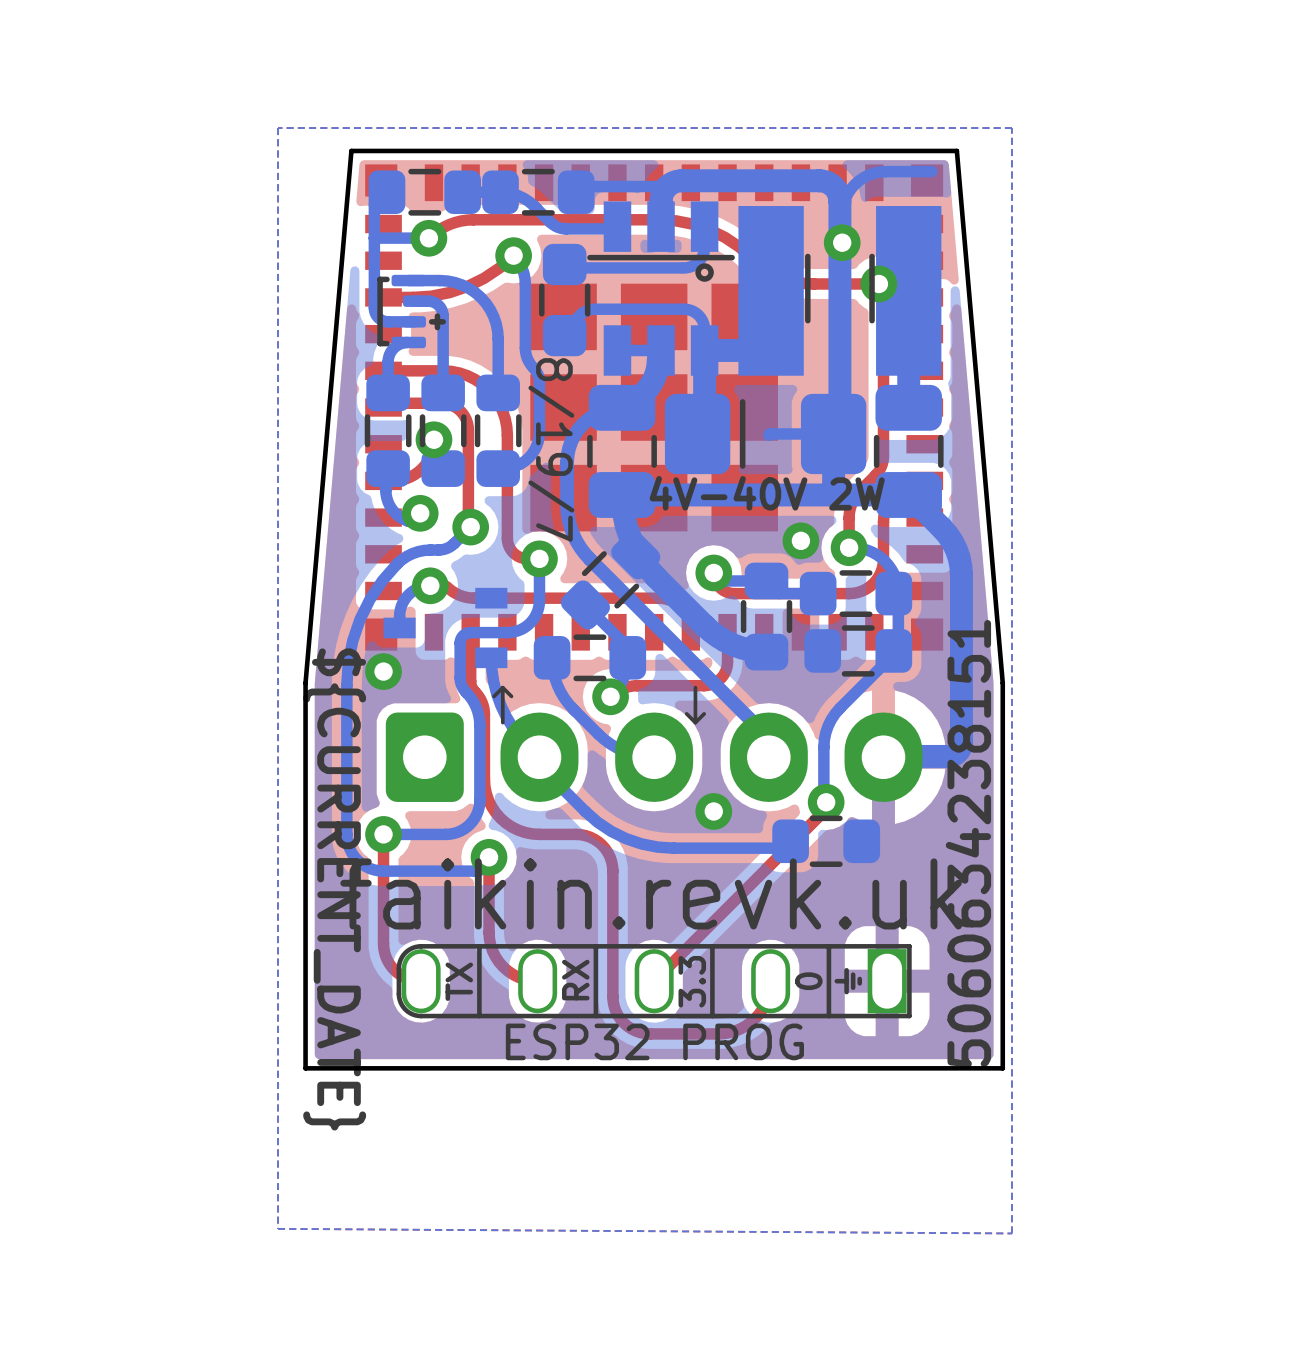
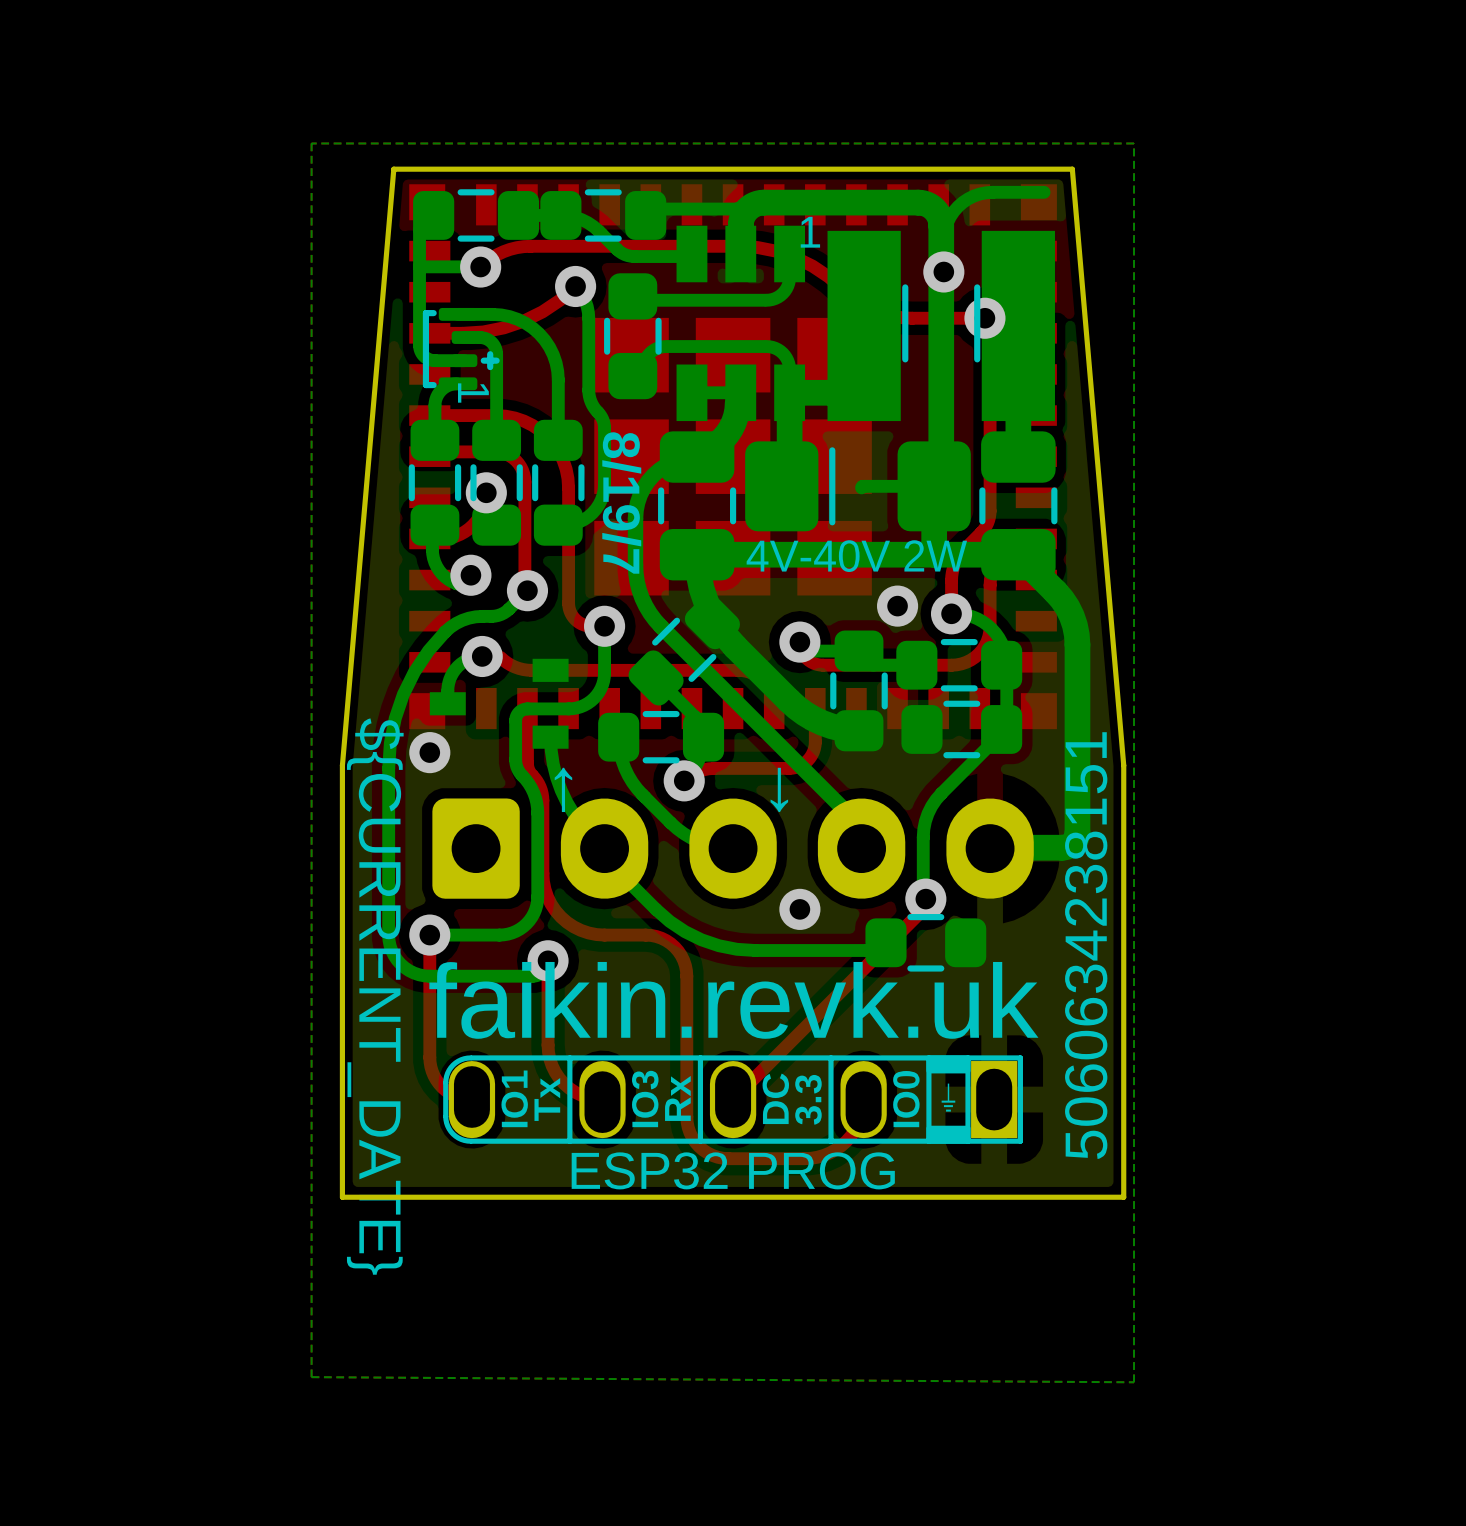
part footprint: [542, 169, 942, 518] -> [608, 189, 1056, 581]
part text: none -> 1 (473, 393)
part footprint: [396, 944, 912, 1019] -> [443, 1055, 1023, 1144]

